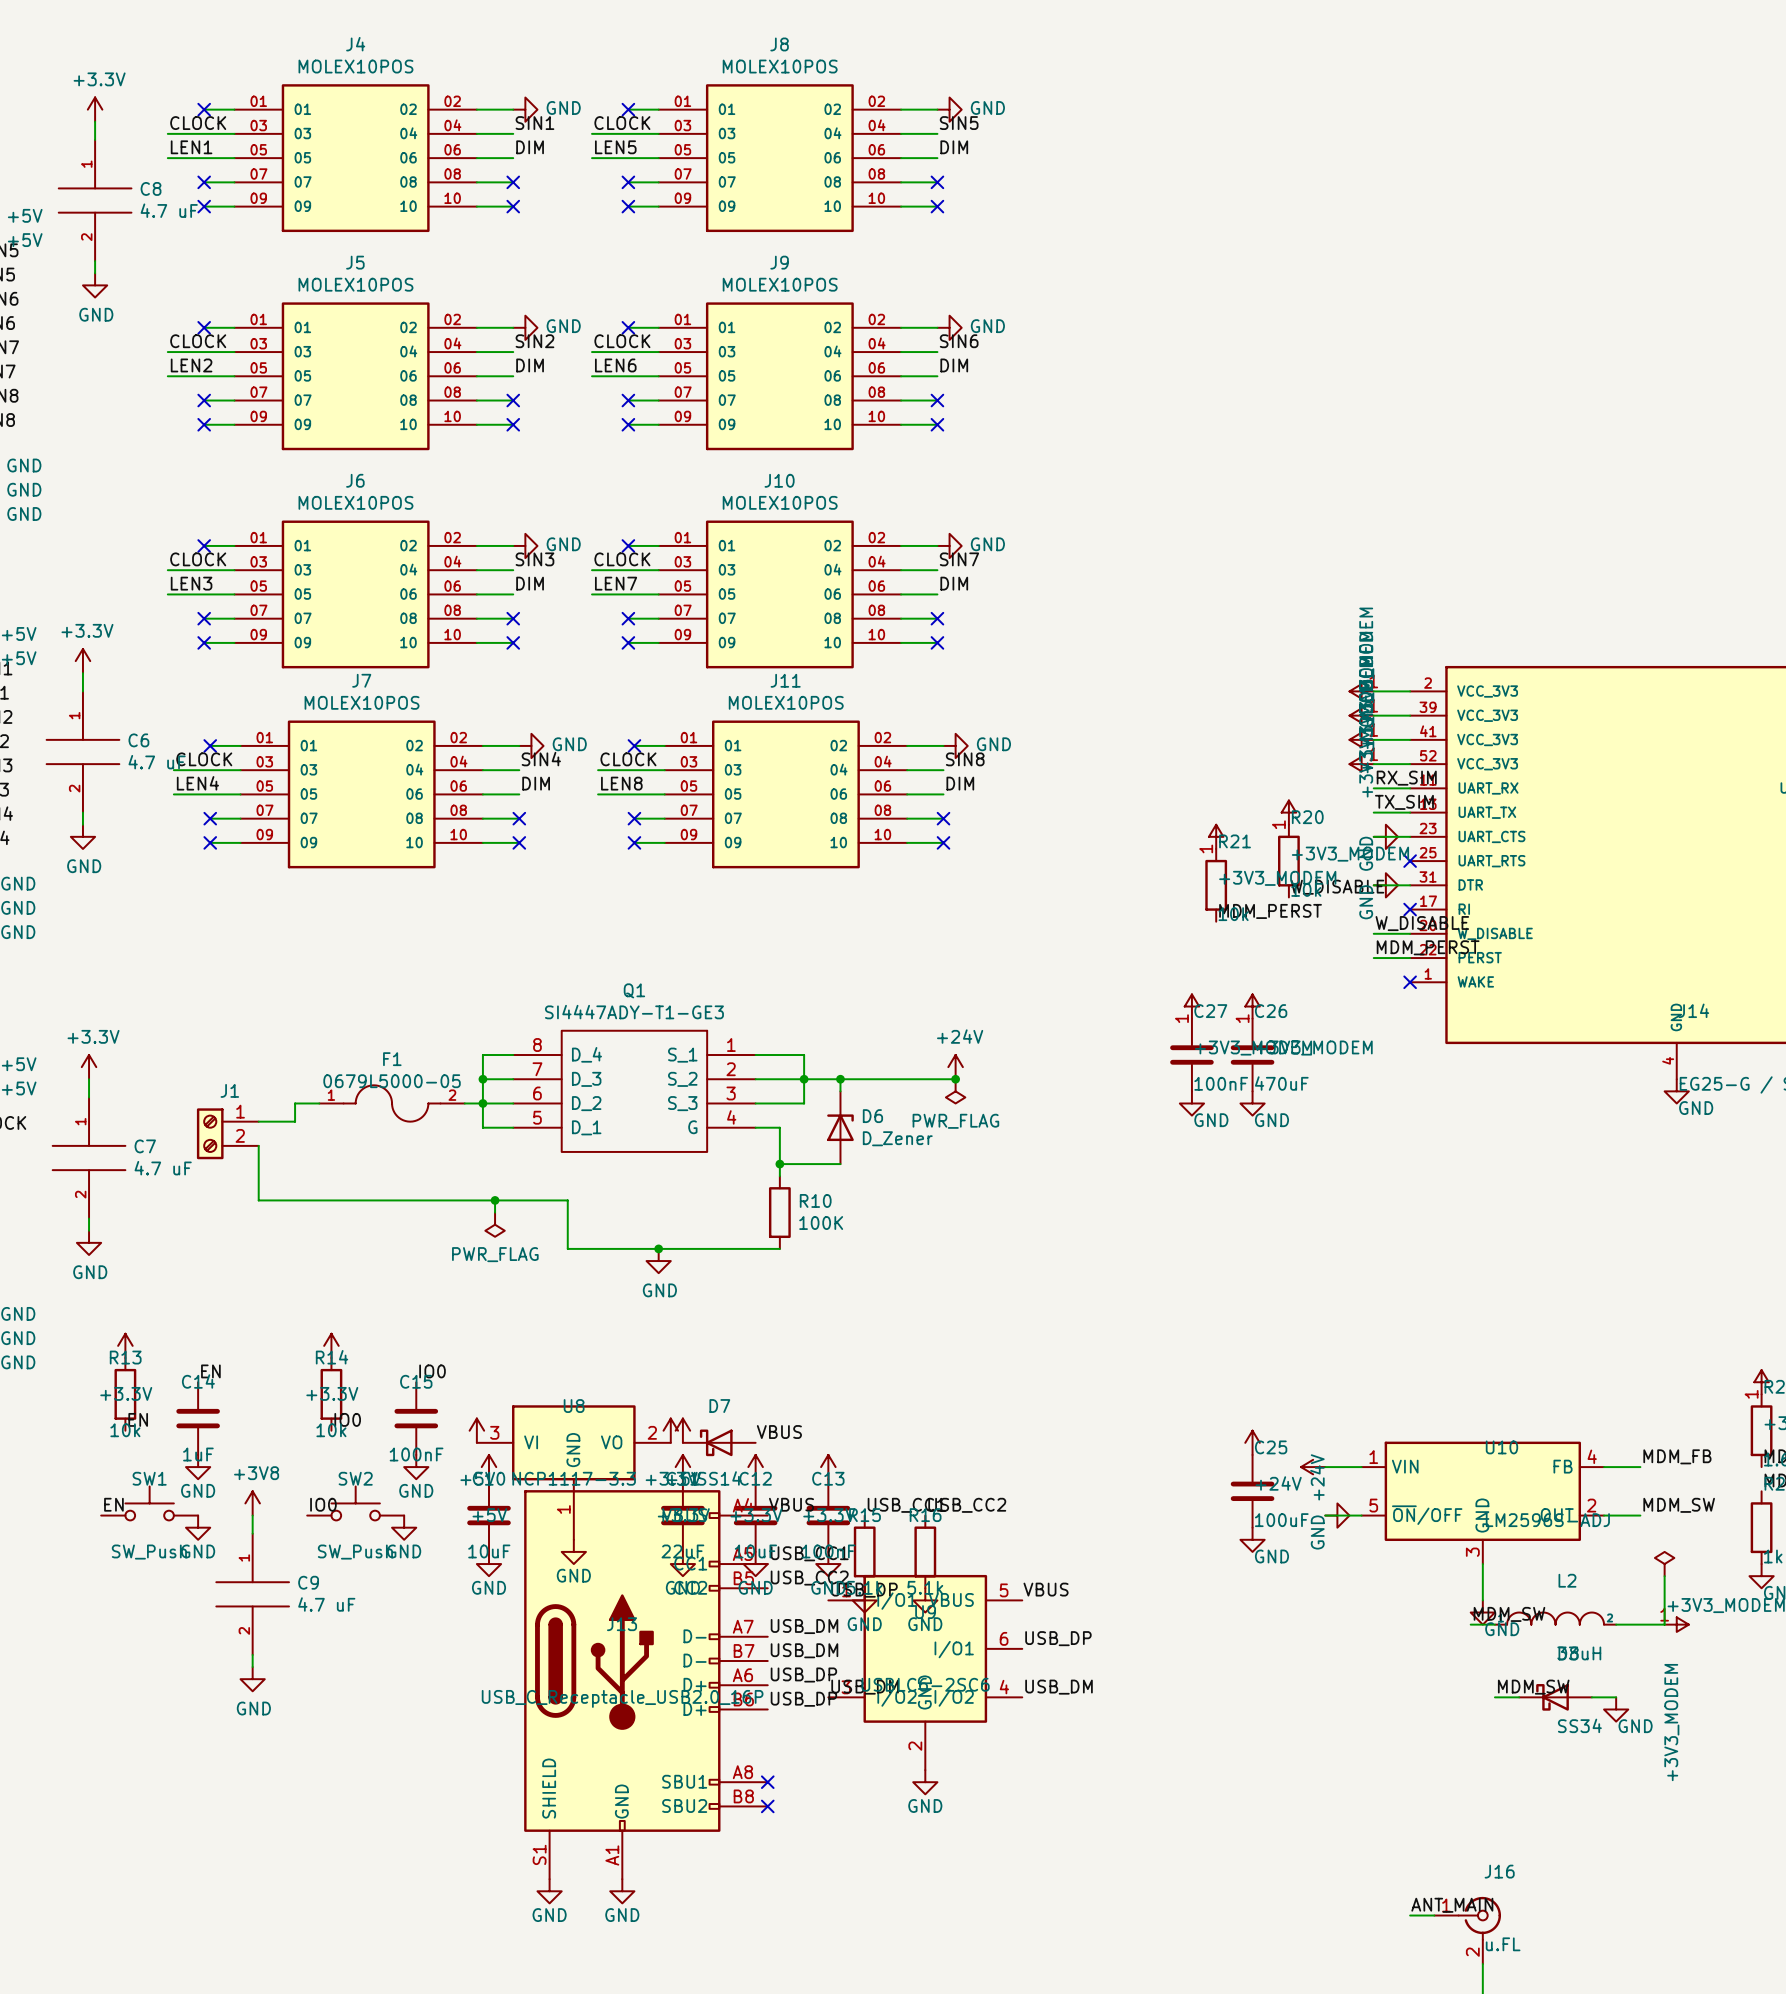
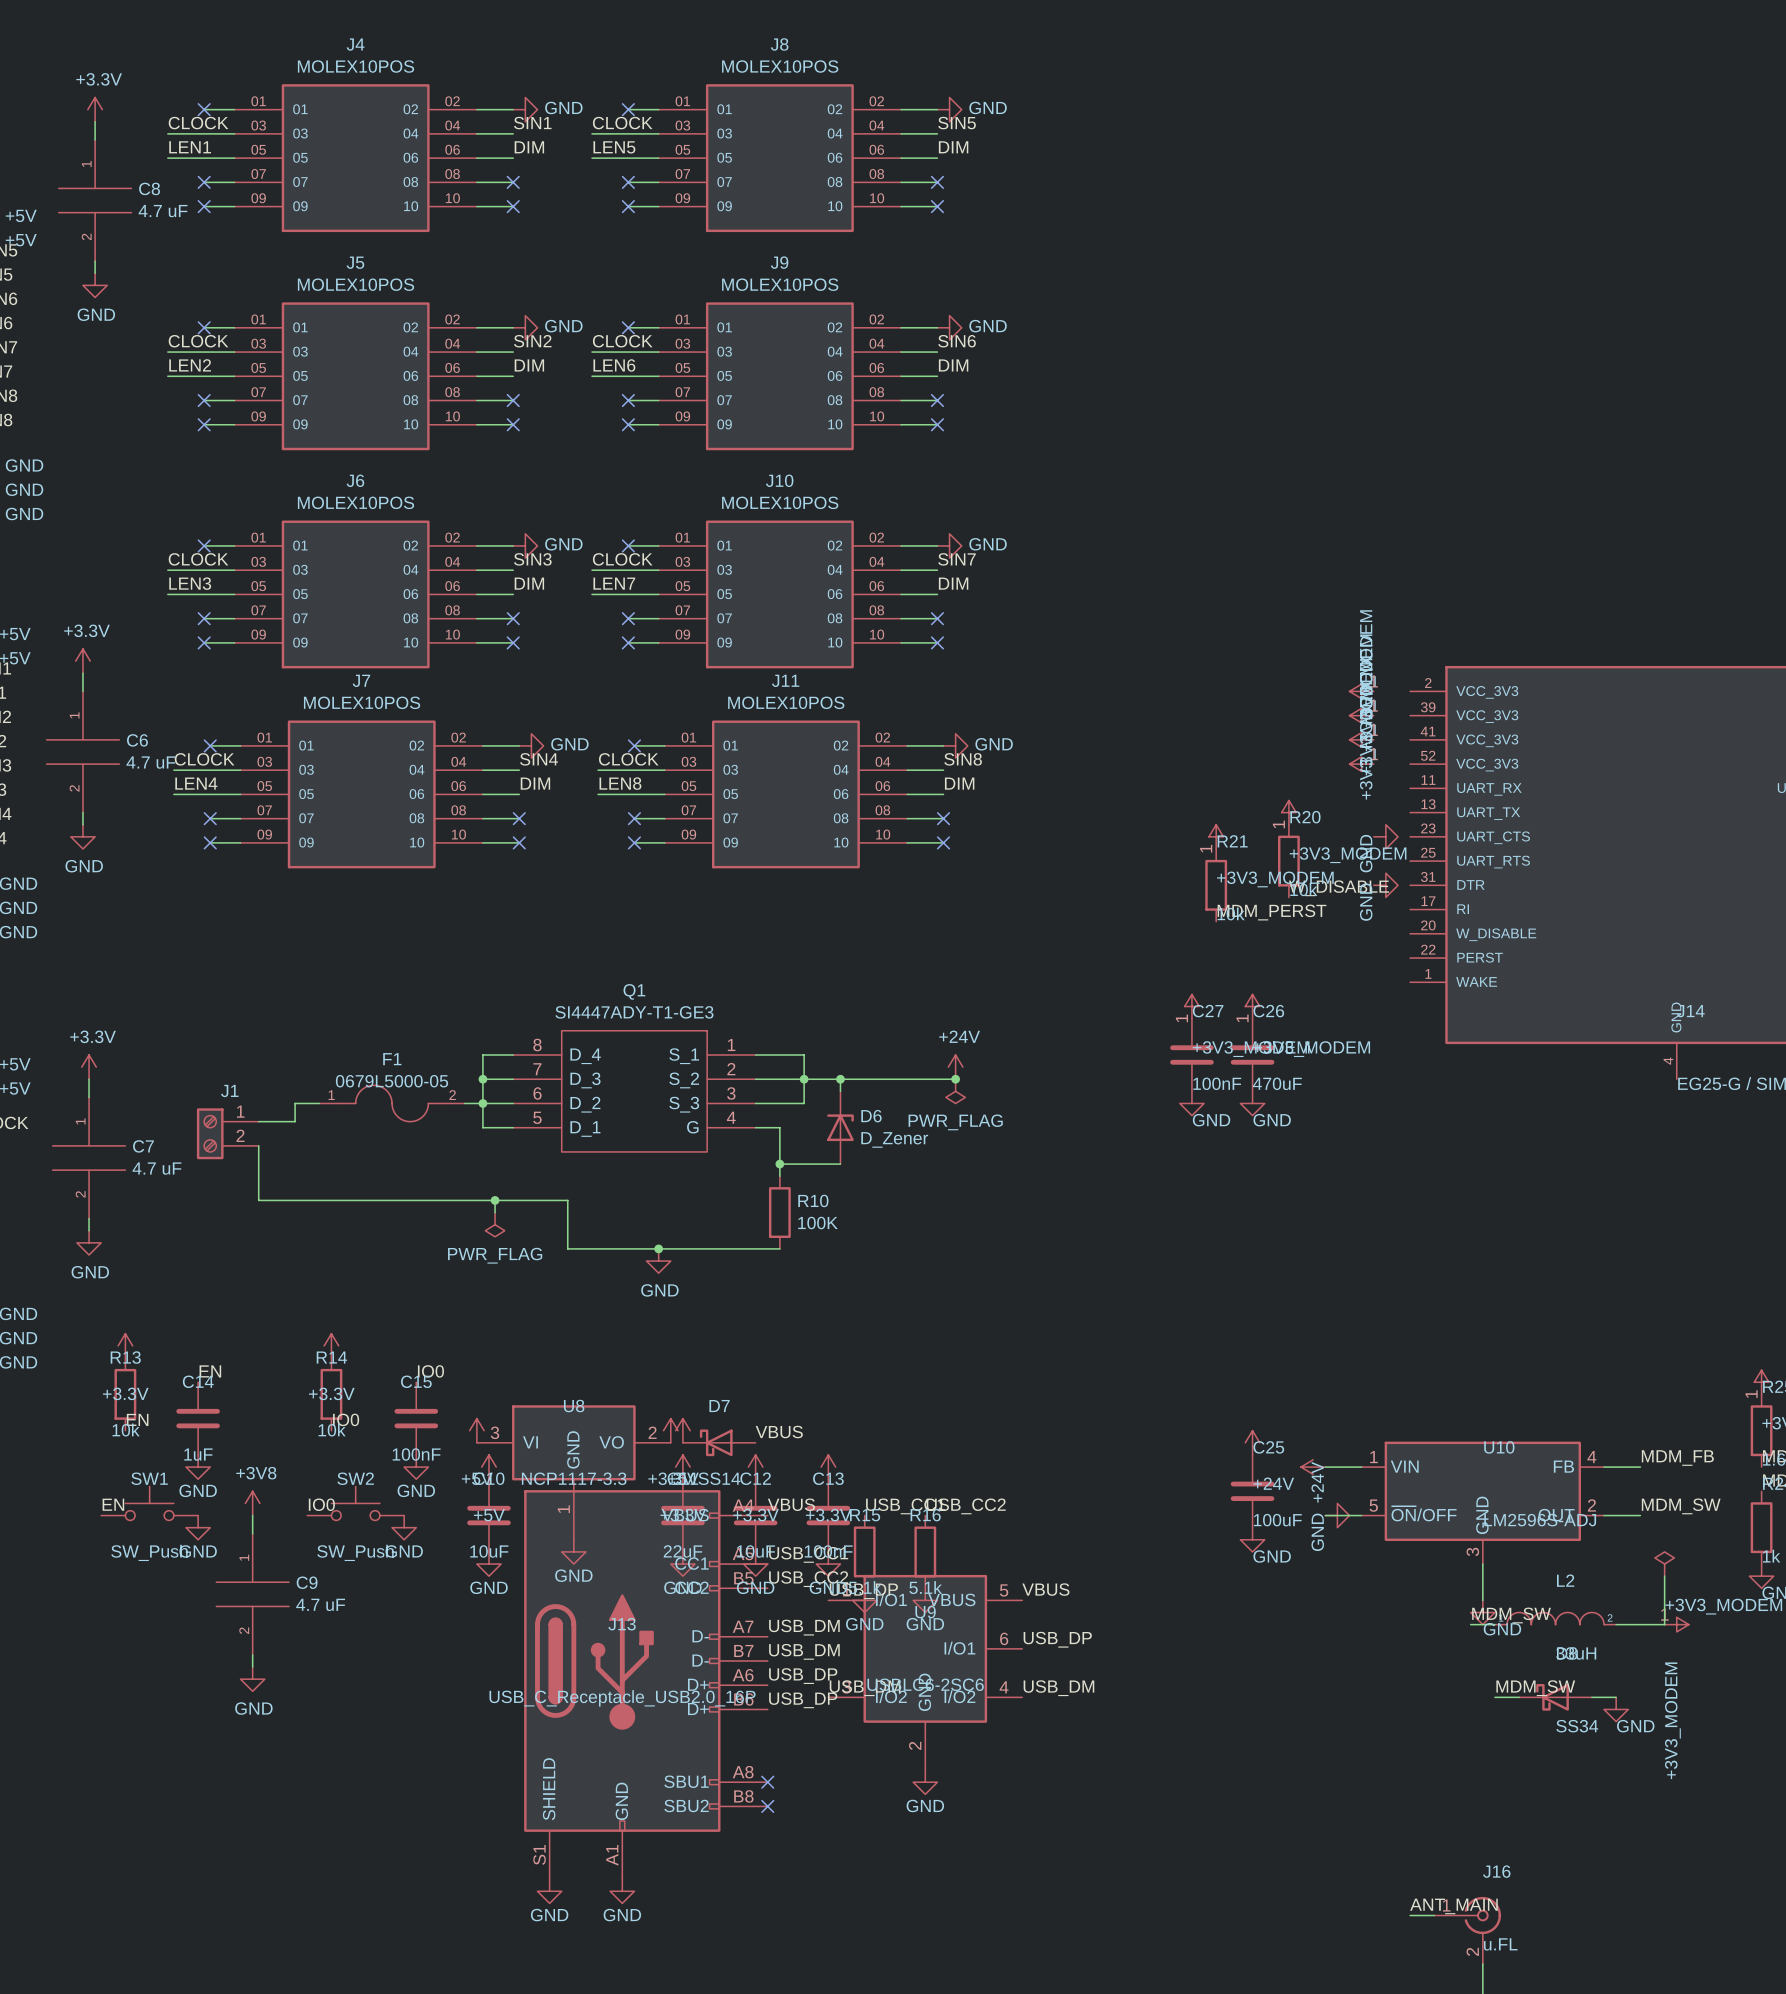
wire: (1373, 691) (1410, 691) -> none
wire: (1373, 715) (1410, 715) -> none
wire: (1373, 739) (1410, 739) -> none
wire: (1373, 764) (1410, 764) -> none
label: RX_SIM (1406, 778) -> none
wire: (1373, 788) (1410, 788) -> none
label: TX_SIM (1404, 802) -> none
wire: (1373, 812) (1410, 812) -> none
wire: (1373, 836) (1410, 836) -> none
no-connect mark: (1410, 861) -> none
wire: (1373, 885) (1410, 885) -> none
no-connect mark: (1410, 909) -> none
label: W_DISABLE (1422, 923) -> none
wire: (1373, 933) (1410, 933) -> none
label: MDM_PERST (1428, 947) -> none
wire: (1373, 958) (1410, 958) -> none
no-connect mark: (1410, 982) -> none
power symbol: GND (1676, 1091) -> none

